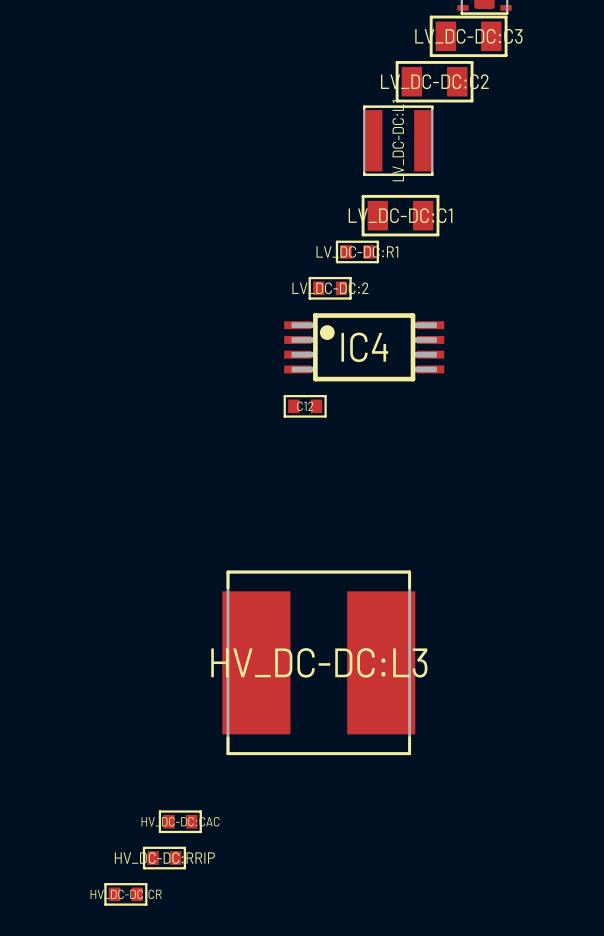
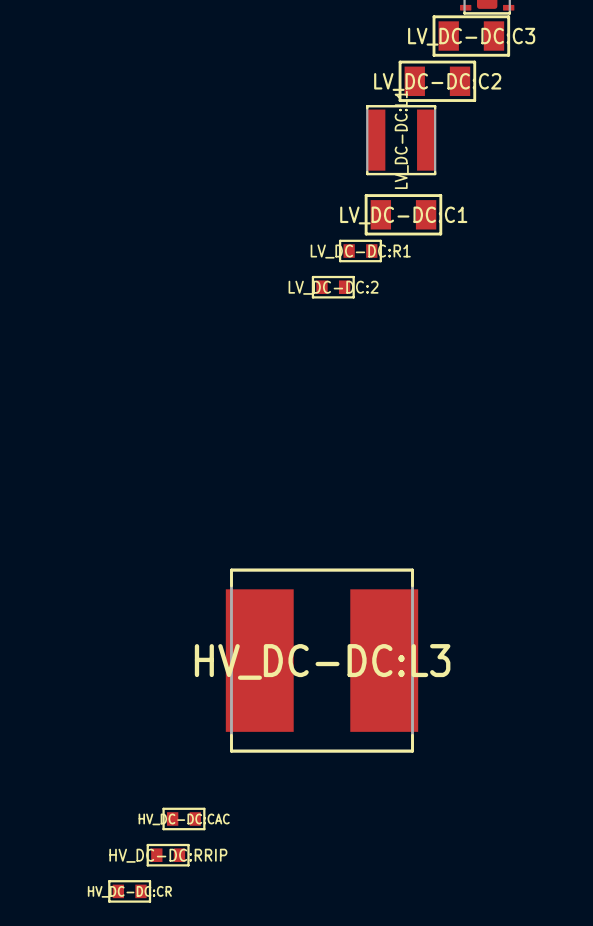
IC4: (364, 347) -> none
C12: (305, 406) -> none

